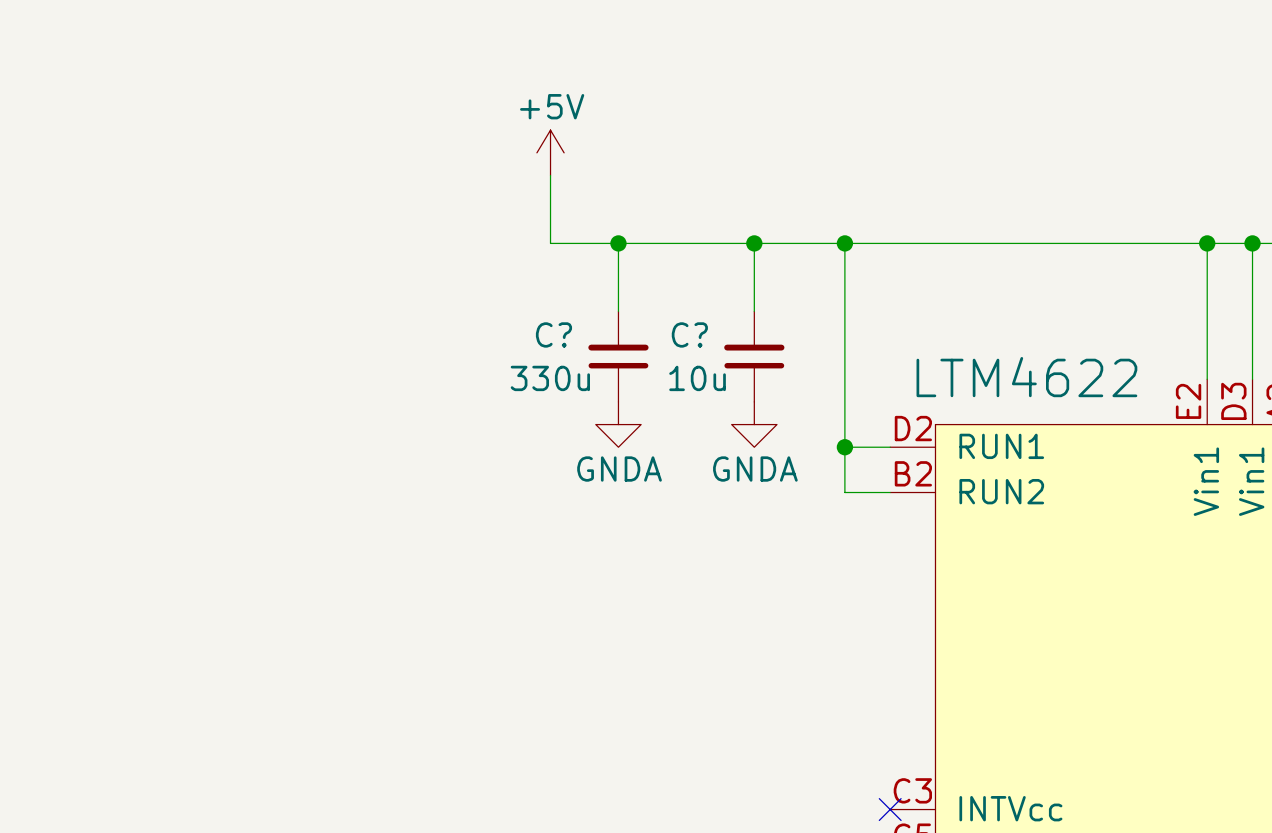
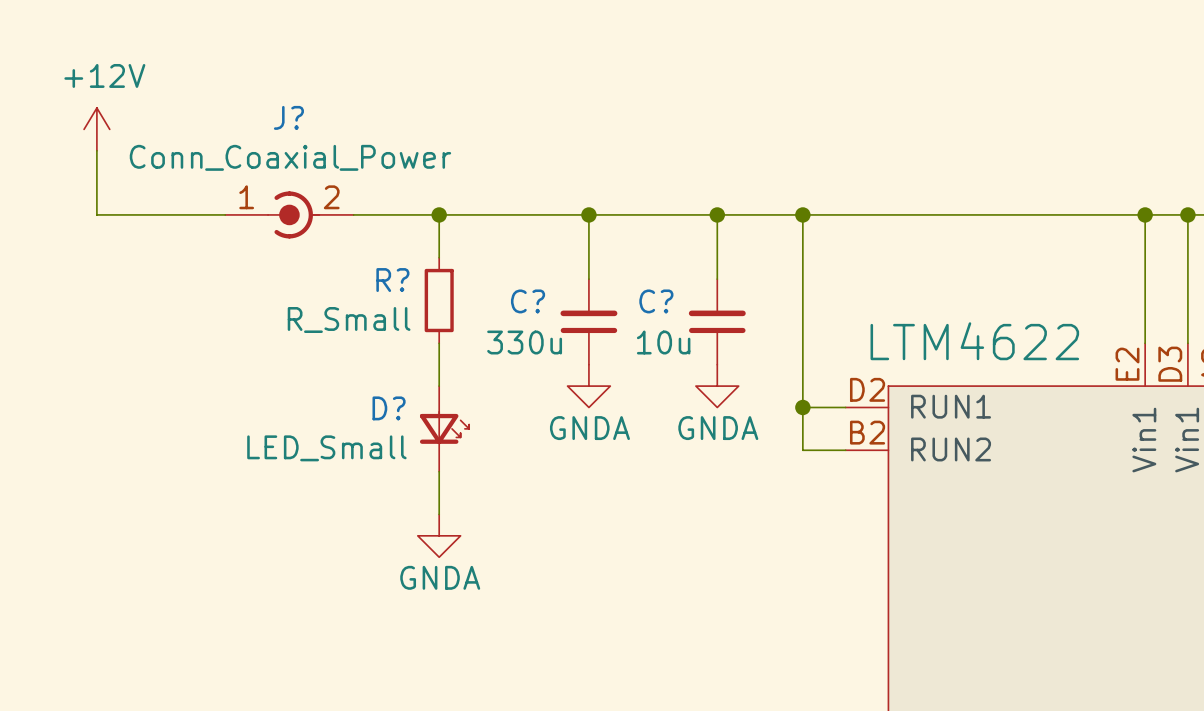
power symbol: none -> +12V (96, 129)
power symbol: +5V (550, 152) -> none
wire: none -> (96, 150) (96, 214) (225, 214)
wire: (550, 175) (550, 243) -> (353, 214) (524, 214)
J?: none -> Conn_Coaxial_Power (289, 214)
wire: none -> (439, 214) (439, 257)
junction: none -> (439, 214)
R?: none -> R_Small (439, 300)
wire: none -> (439, 343) (439, 386)
D?: none -> LED_Small (444, 428)
wire: none -> (439, 471) (439, 514)
power symbol: none -> GNDA (439, 535)

